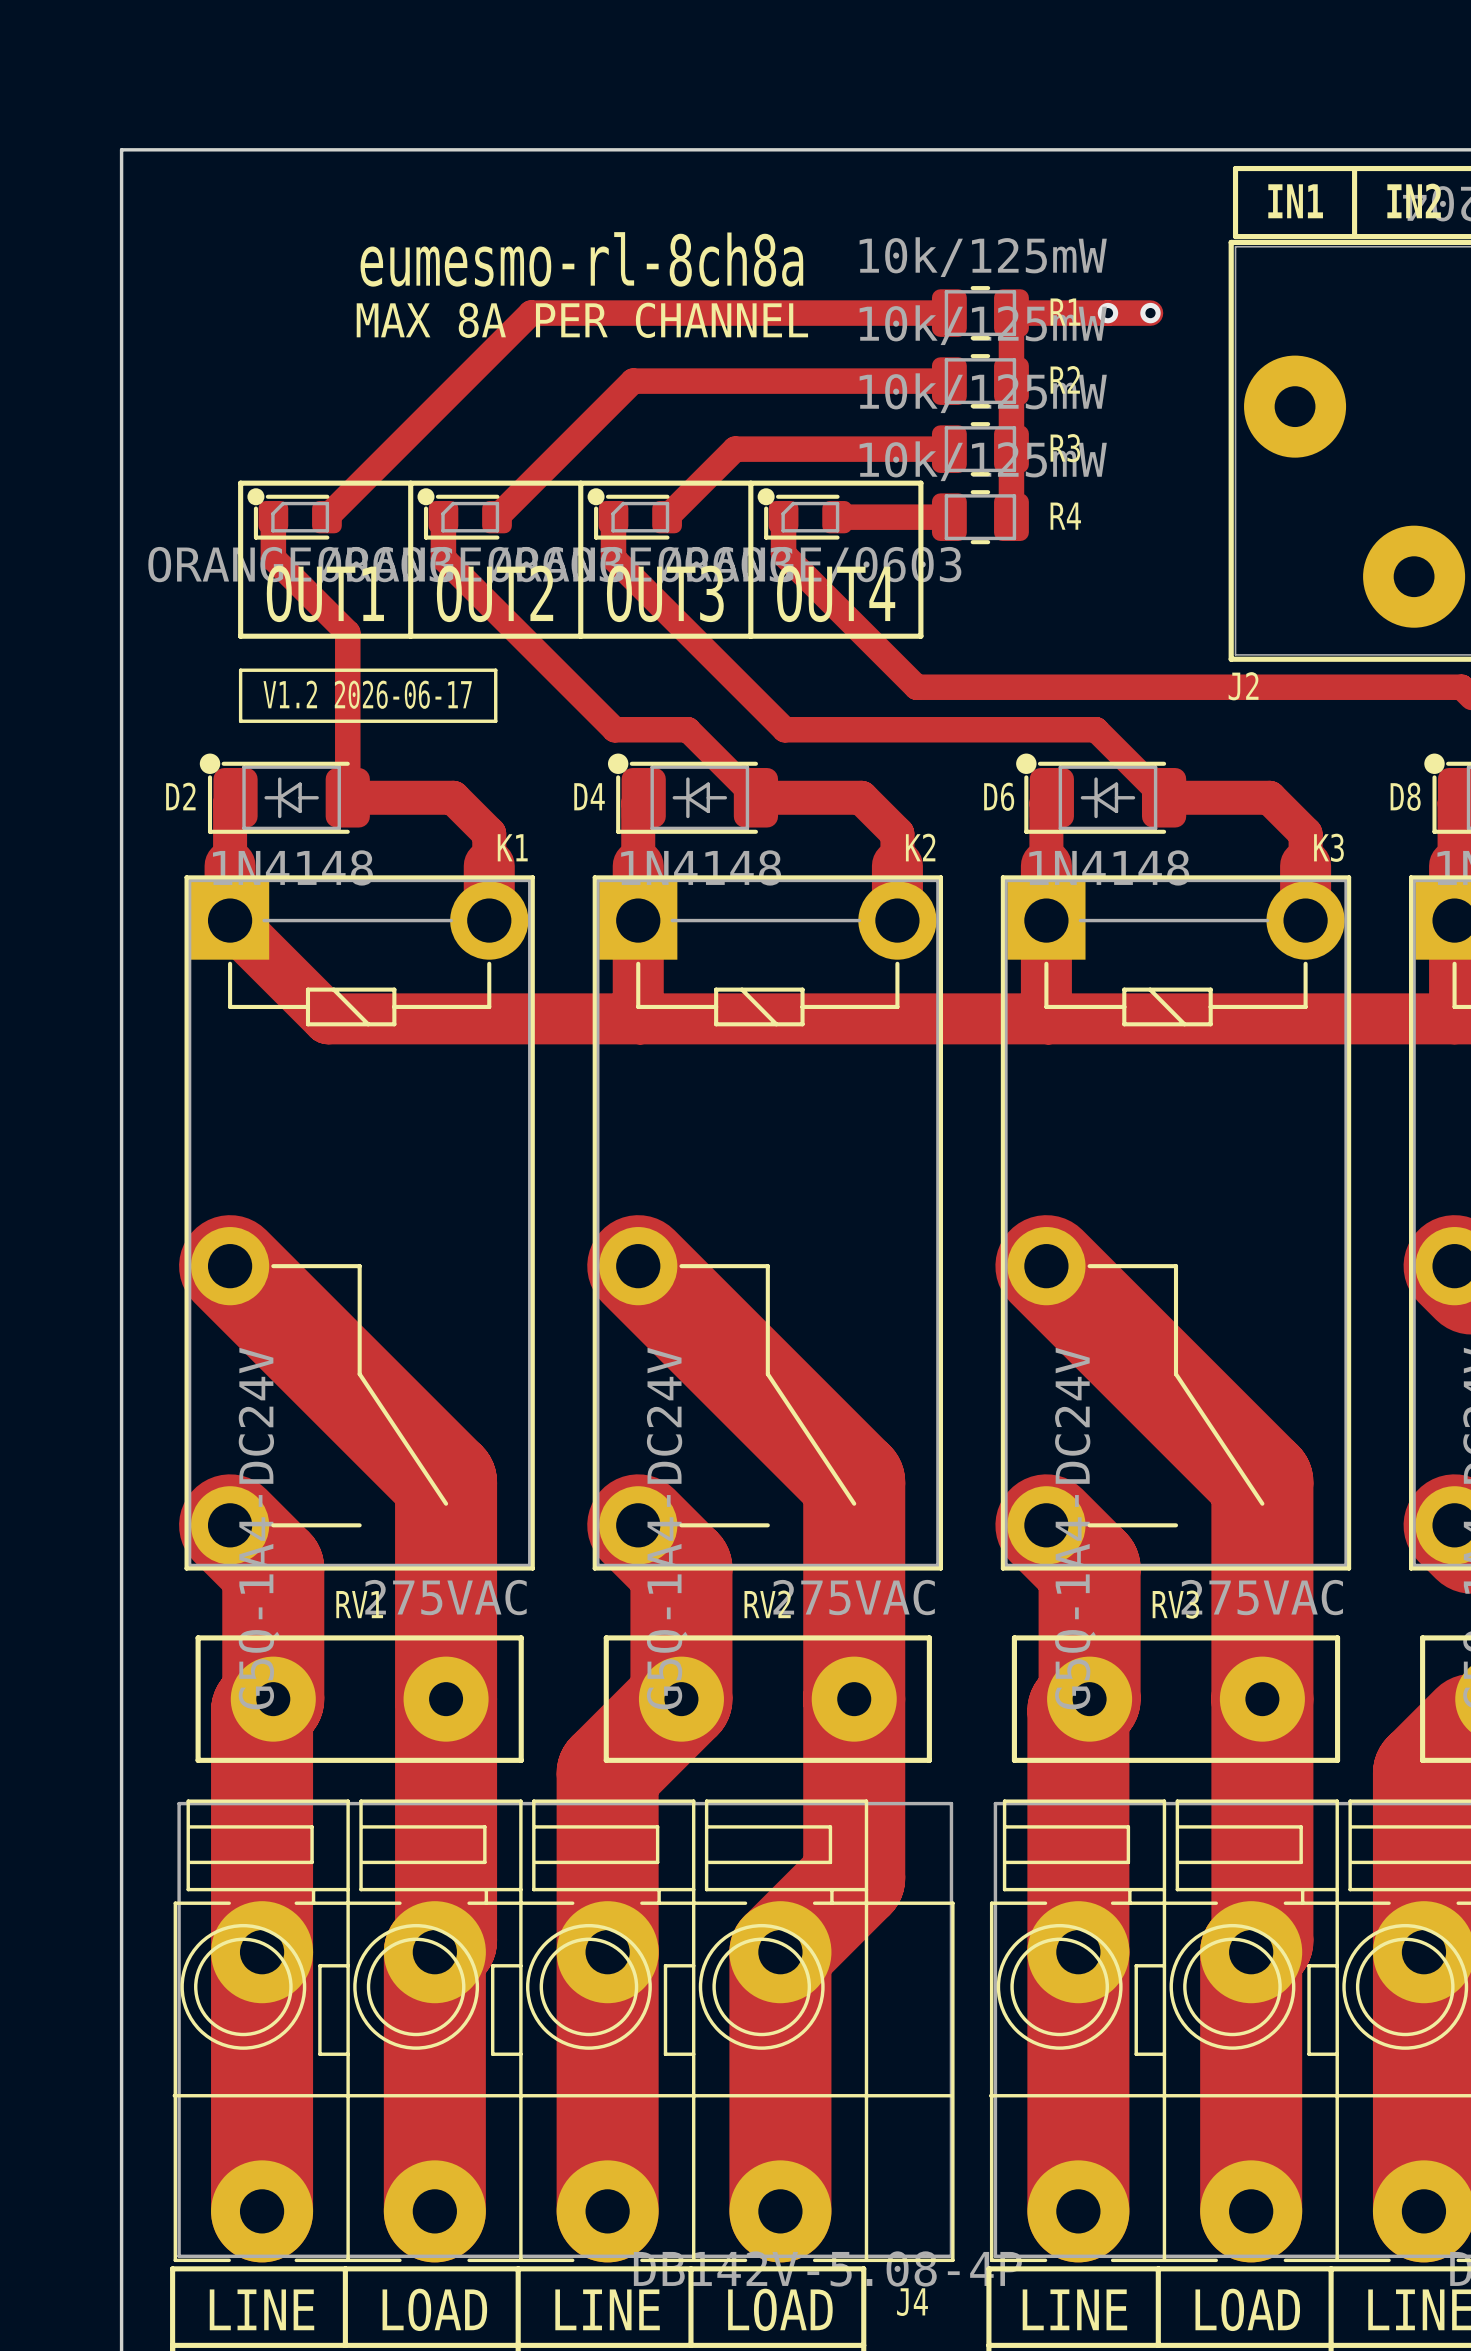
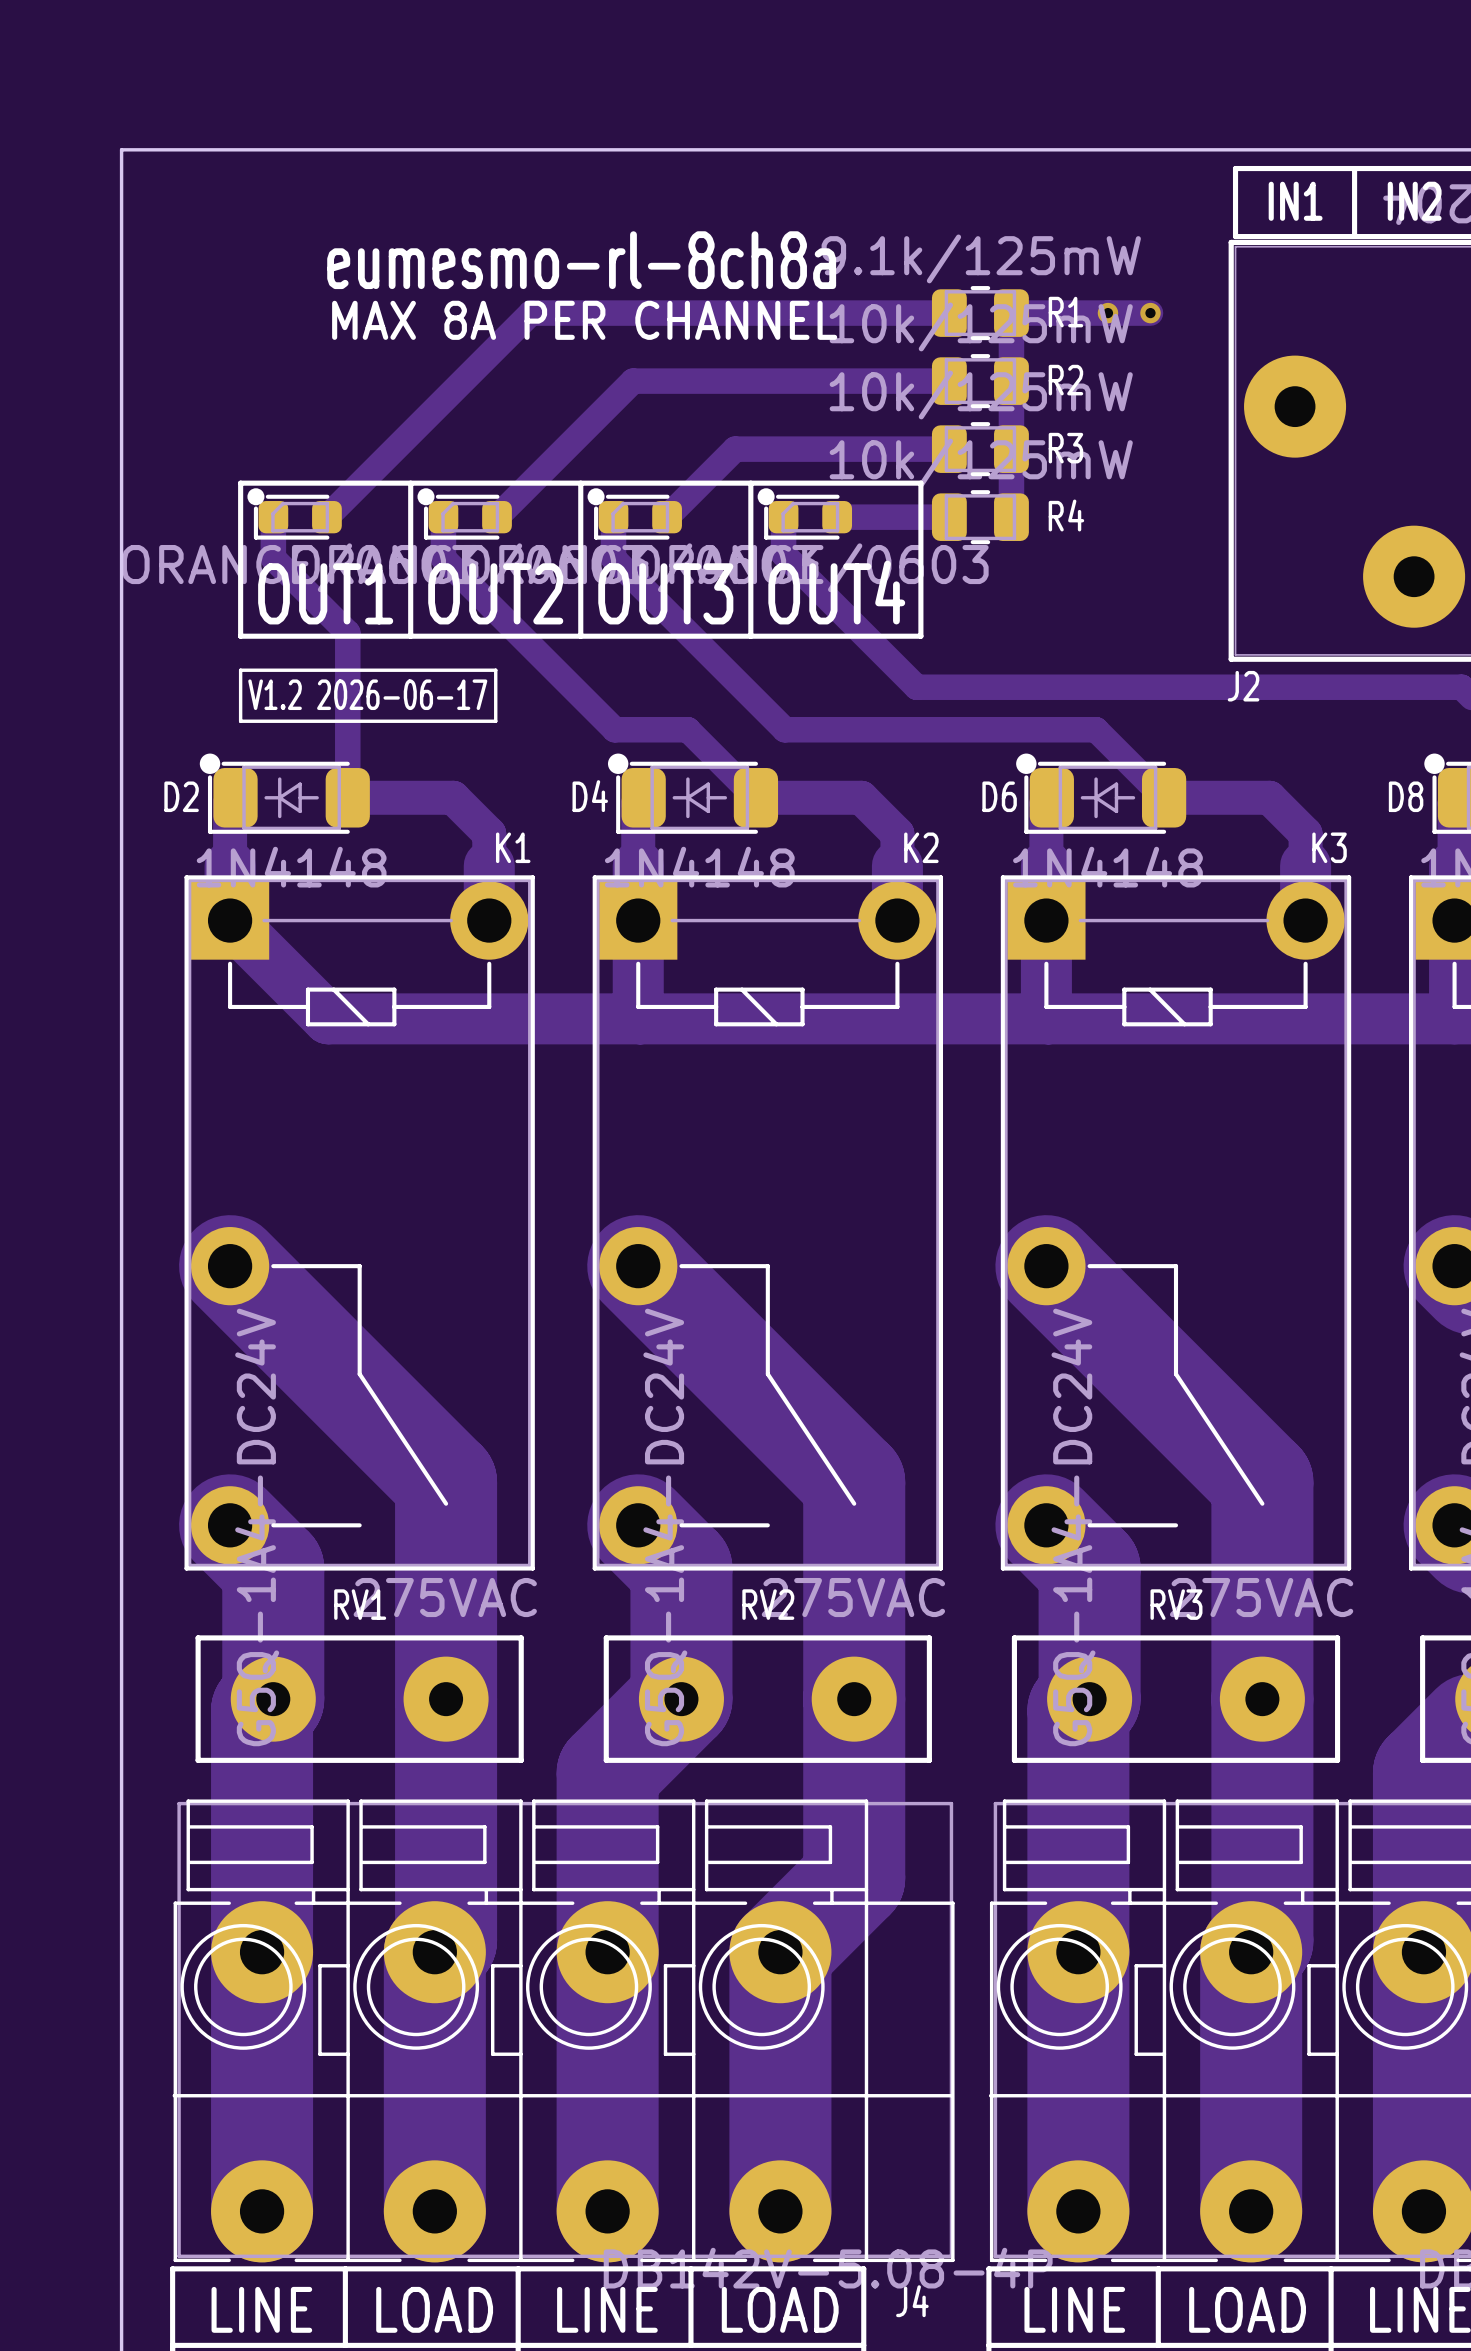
R1 value: 10k/125mW (983, 257) -> 9.1k/125mW (981, 258)

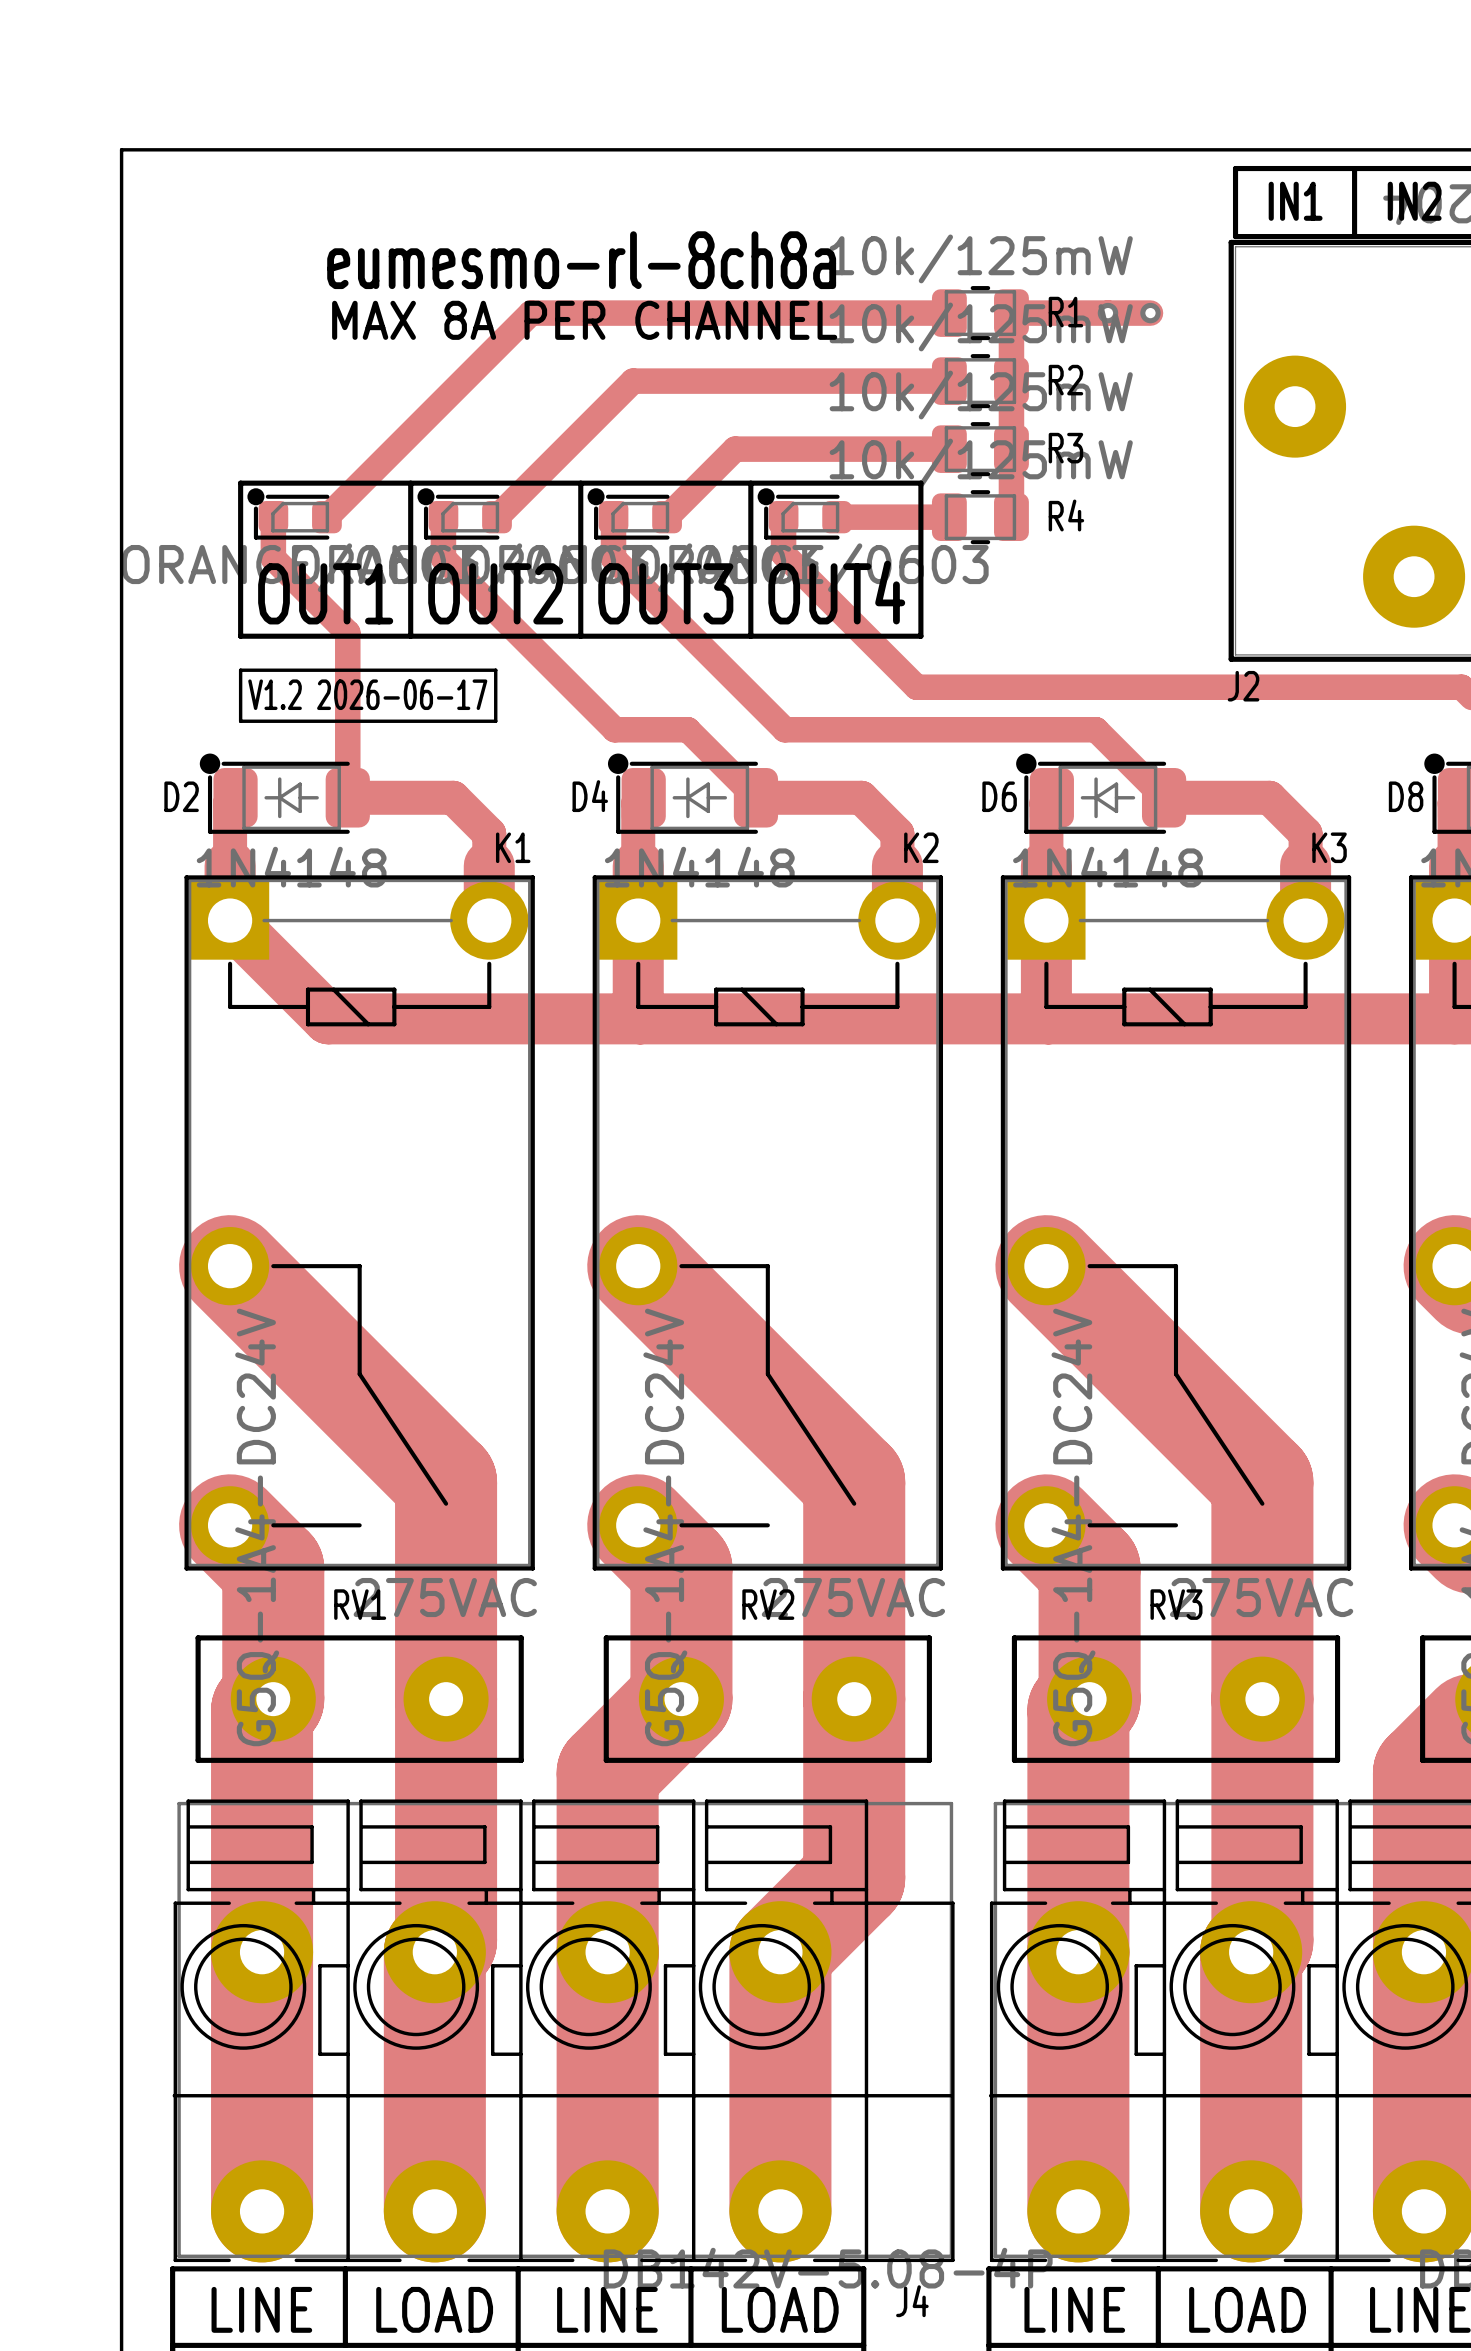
R1 value: 9.1k/125mW (981, 258) -> 10k/125mW (981, 258)

